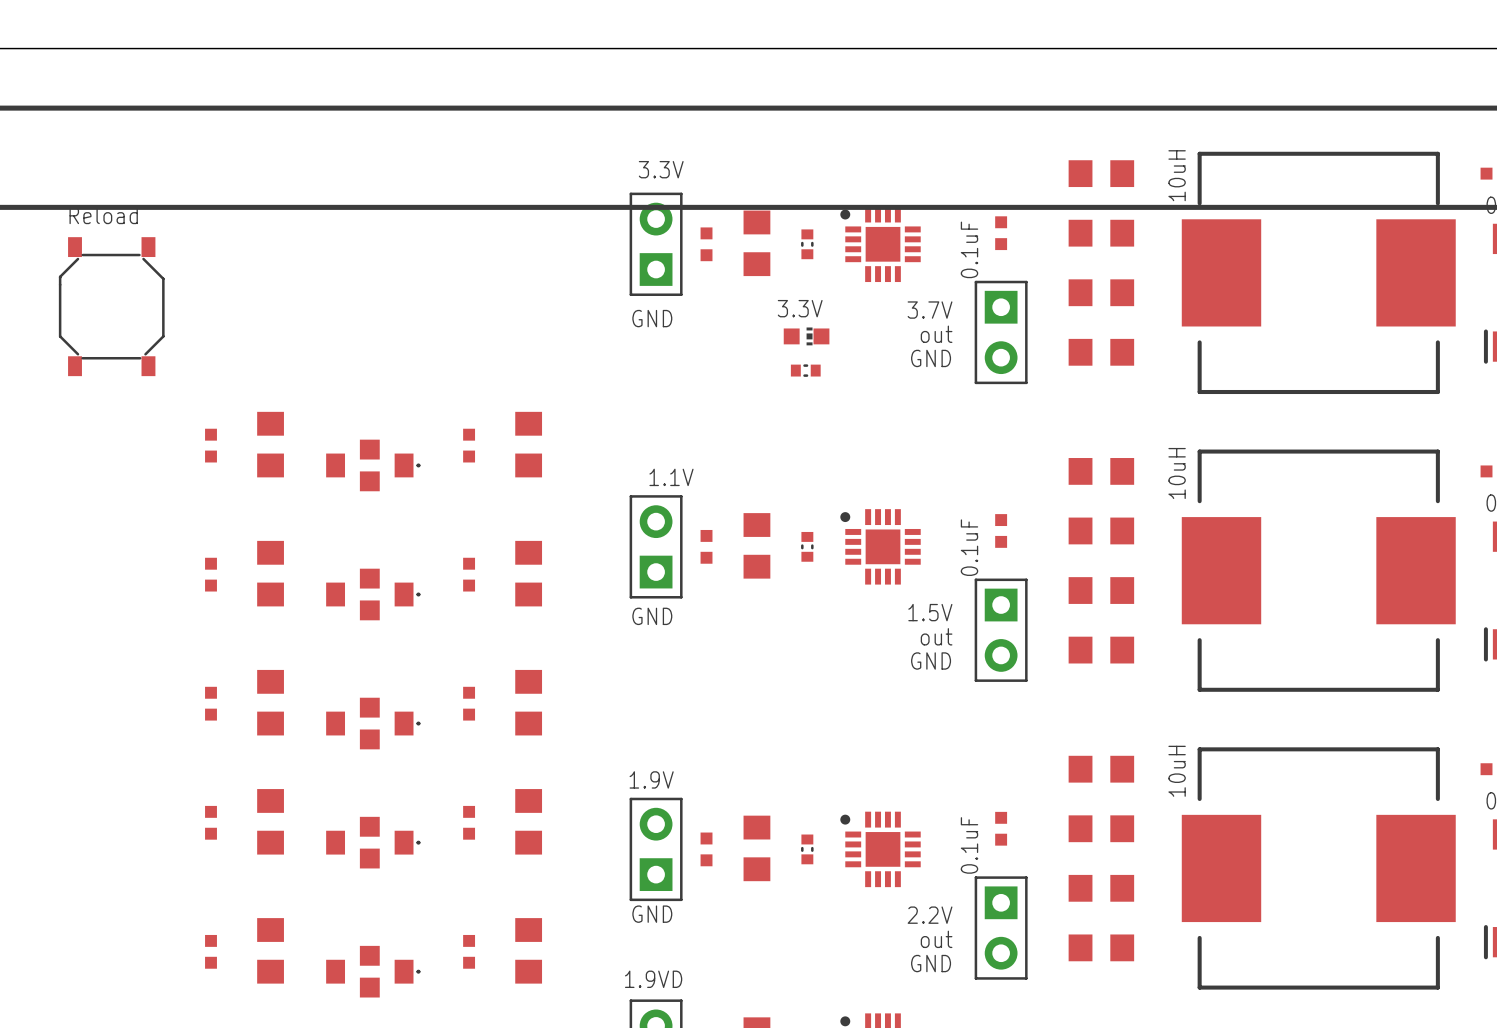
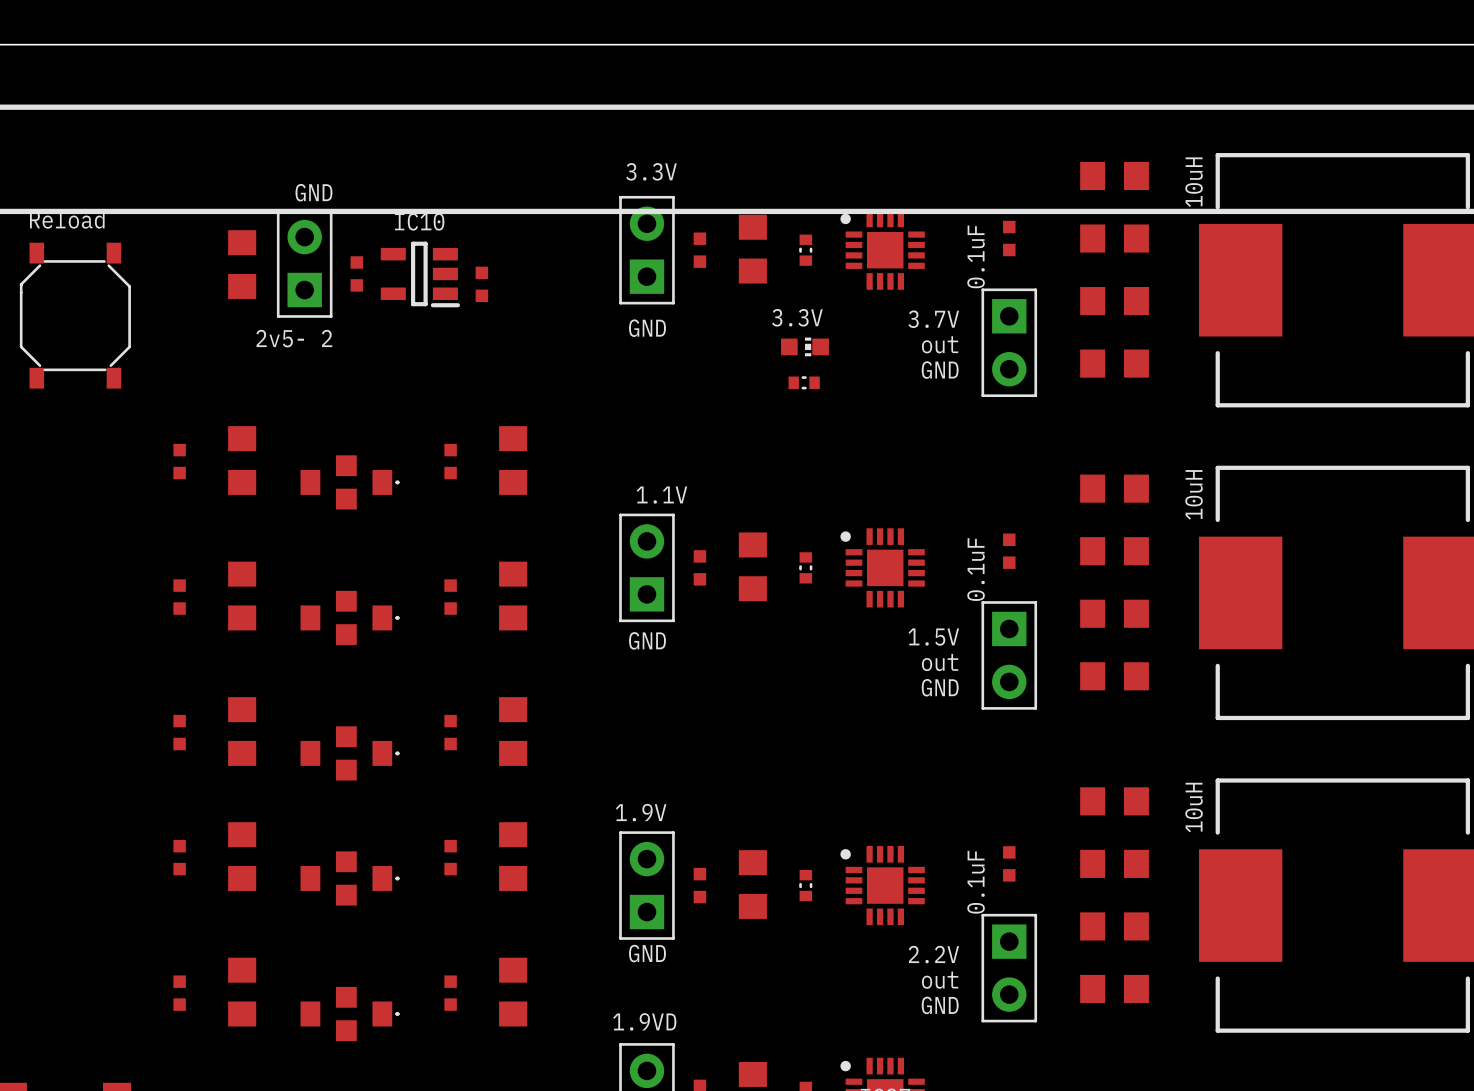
text: none -> GND (313, 192)
part: none -> (304, 263)
part: none -> (242, 264)
part: none -> (356, 273)
IC10: none -> (420, 274)
part: none -> (481, 284)
text: none -> 2v5- 2 (294, 338)

